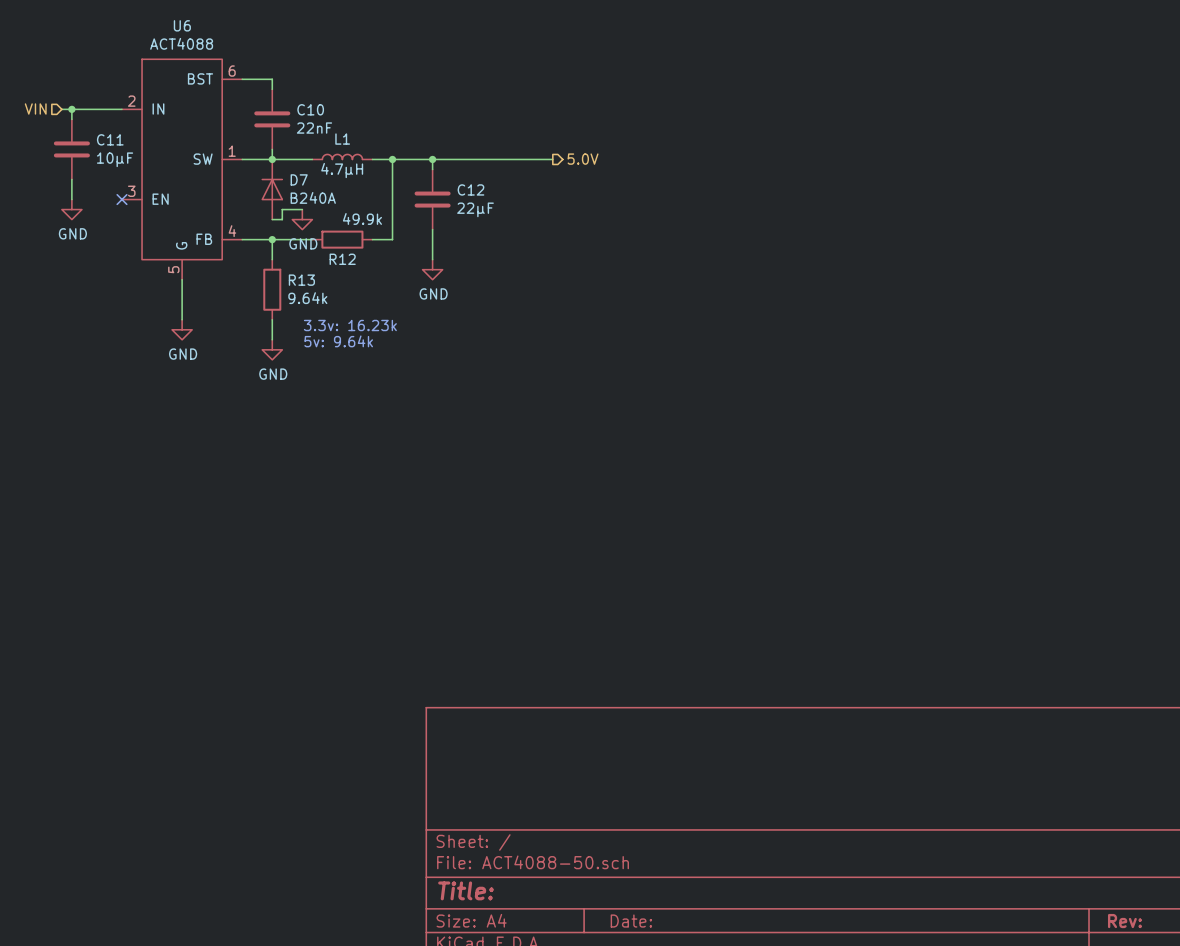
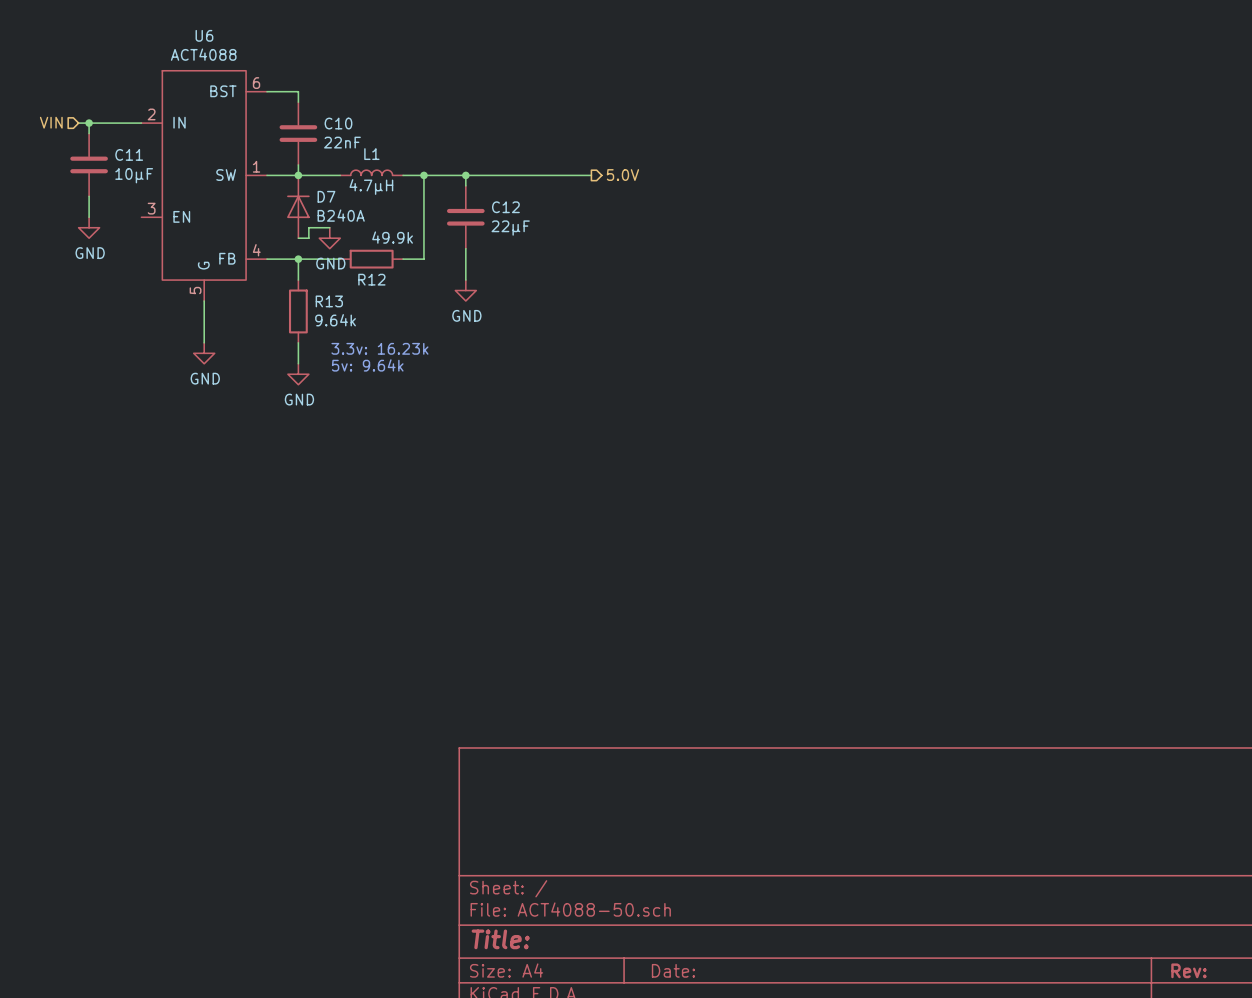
no-connect mark: (121, 199) -> none

